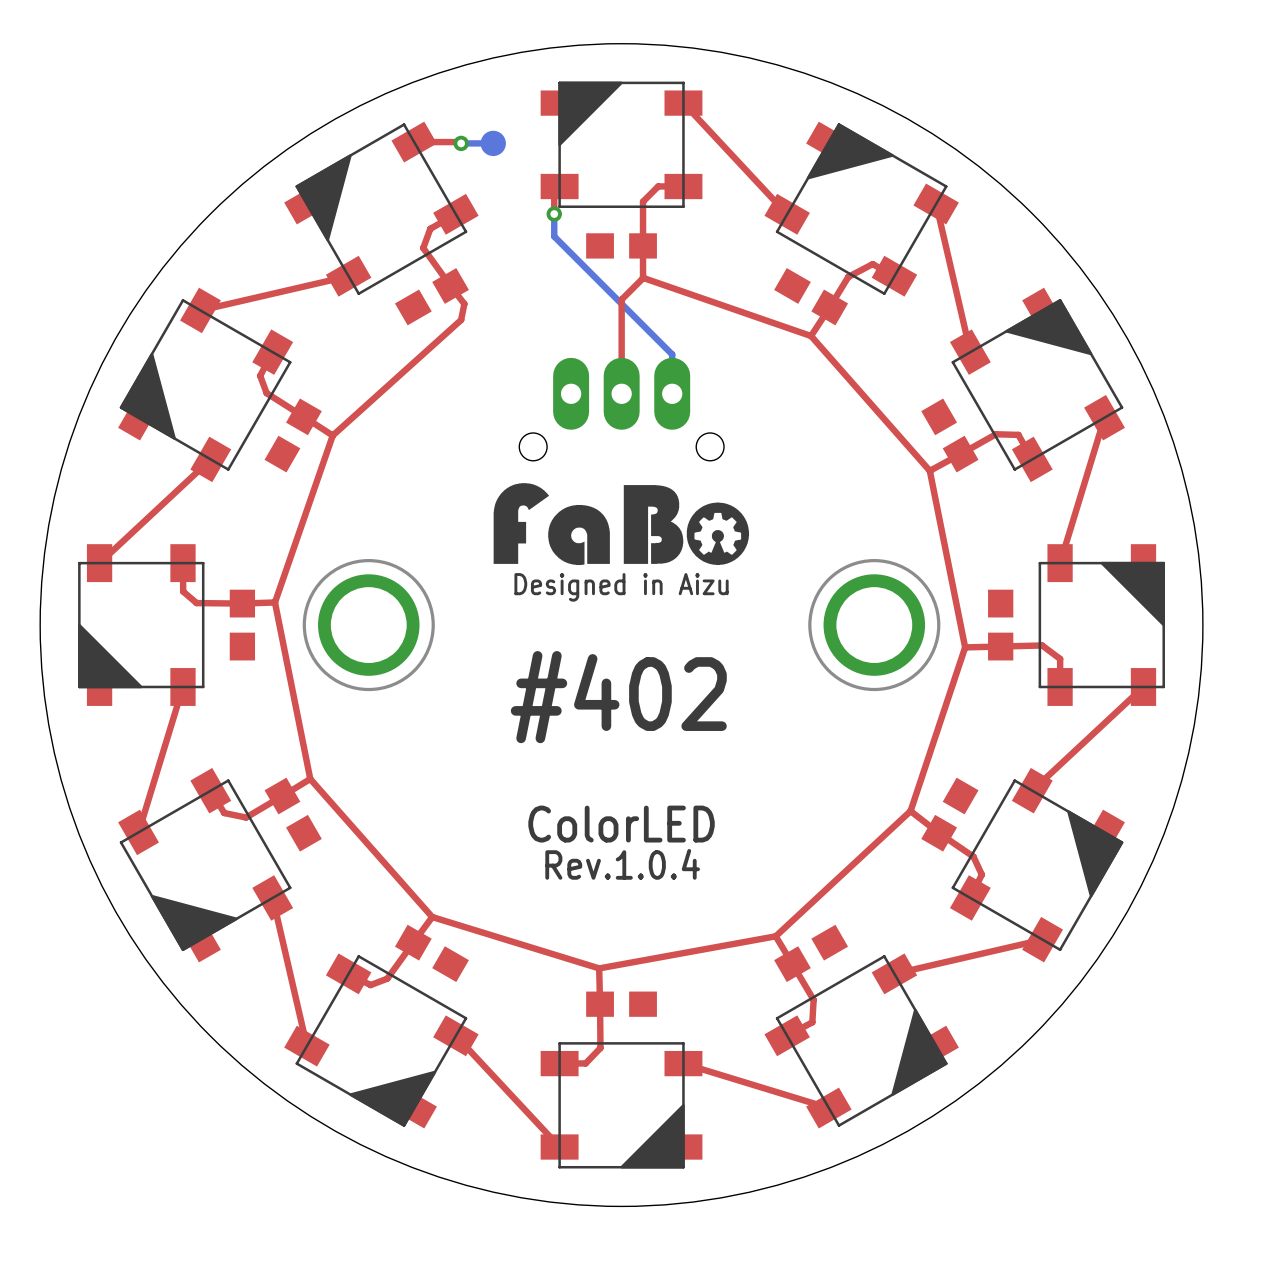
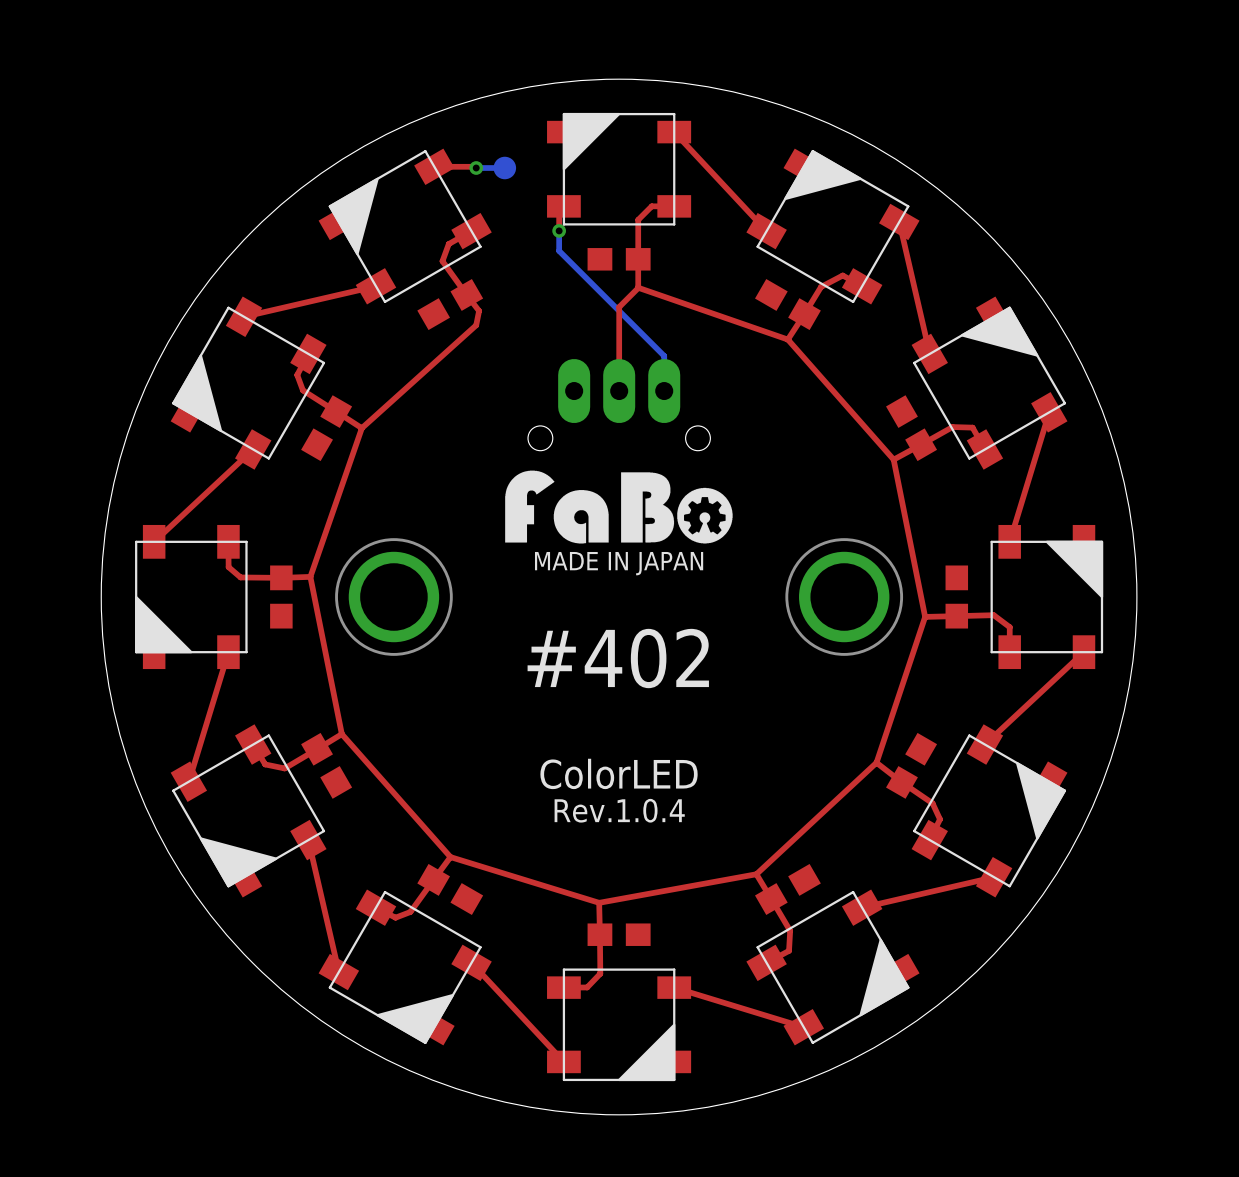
text: Designed in Aizu (621, 587) -> MADE IN JAPAN (619, 563)

